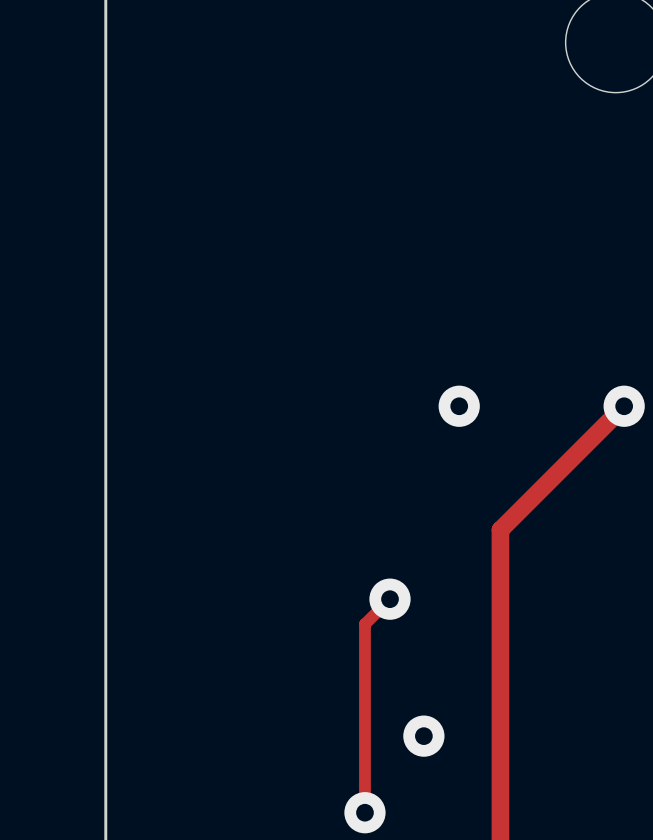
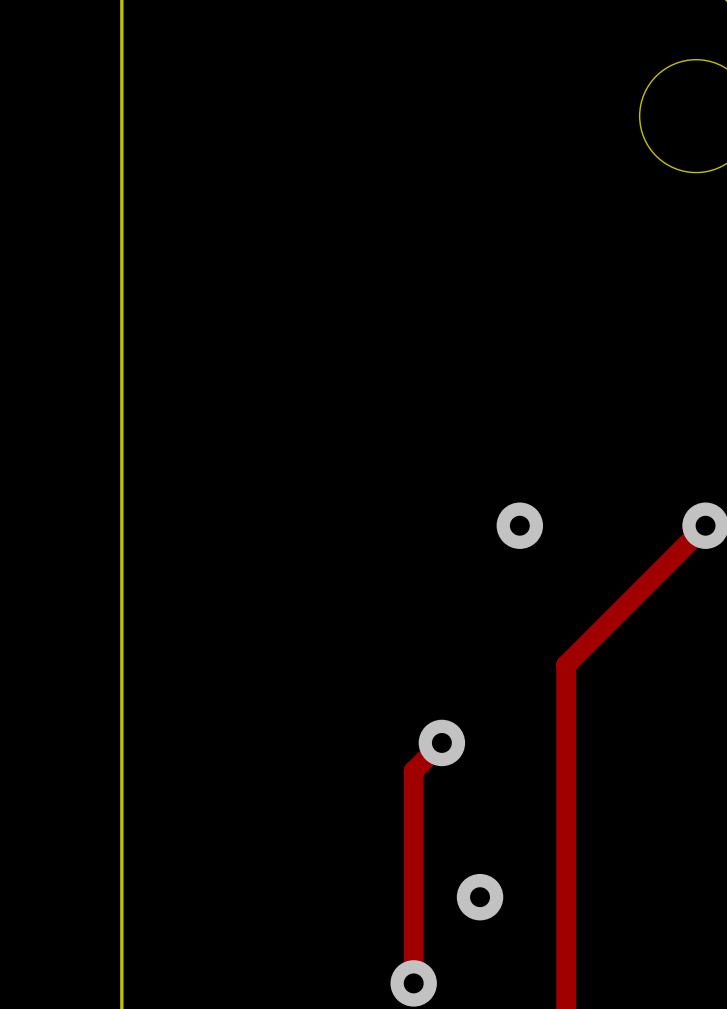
track width: thin (390, 599) (364, 624) (364, 812) -> thick (441, 742) (413, 771) (413, 983)

